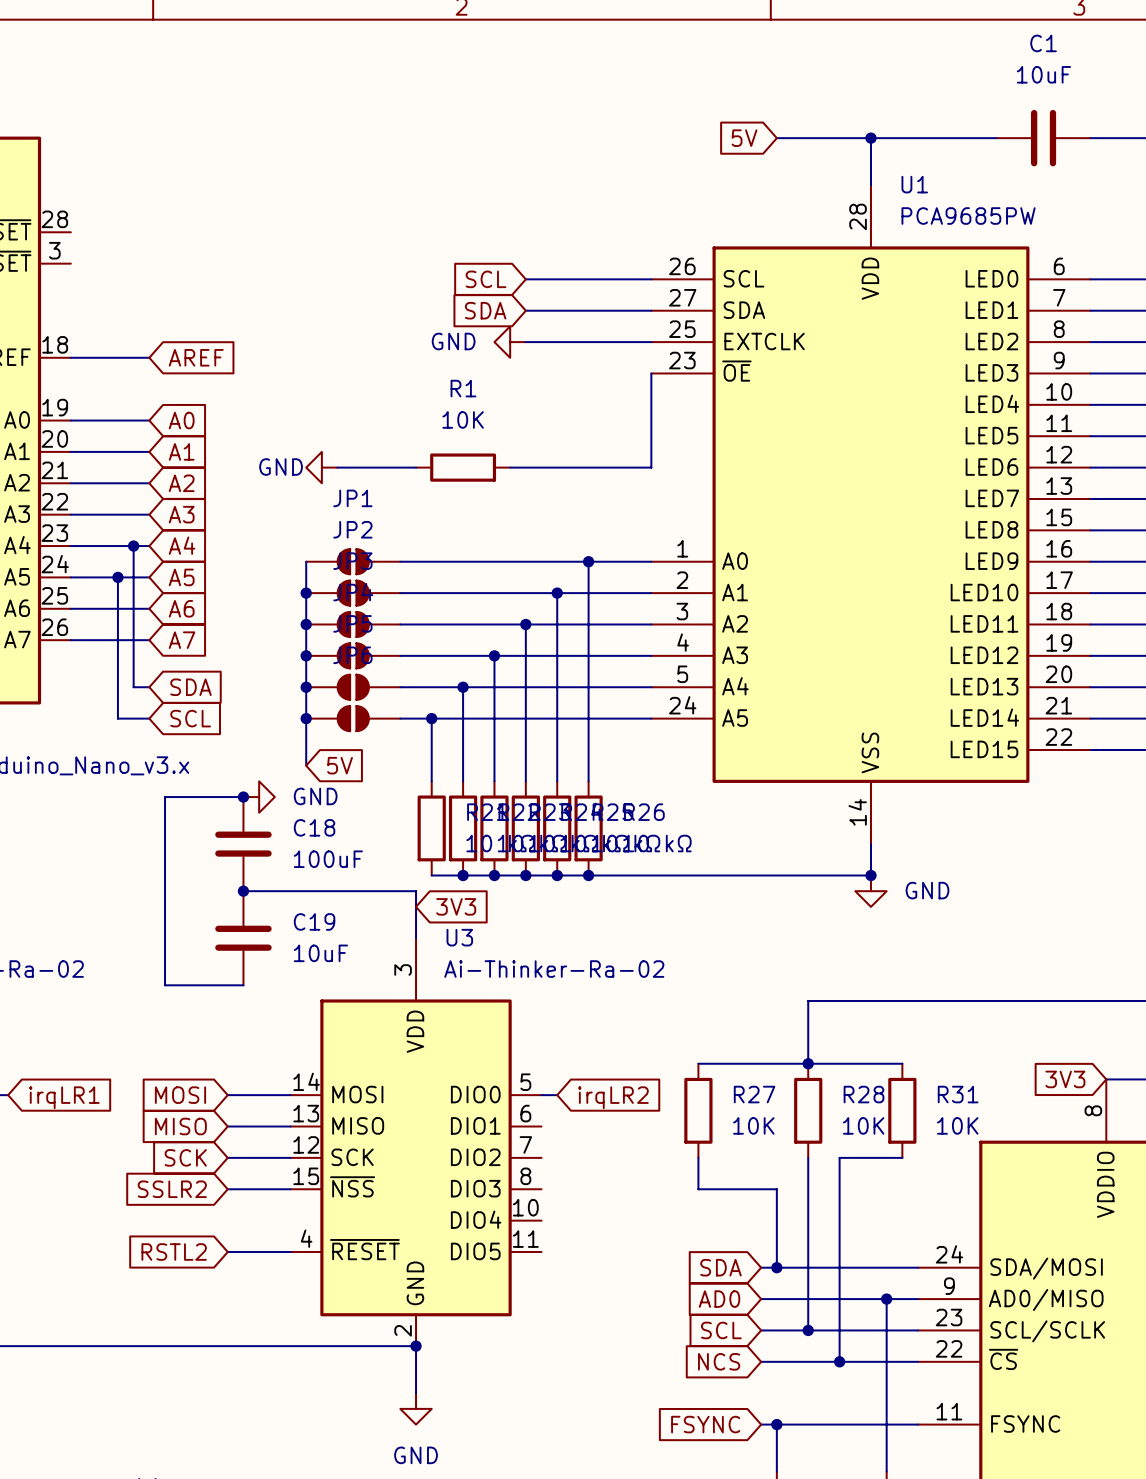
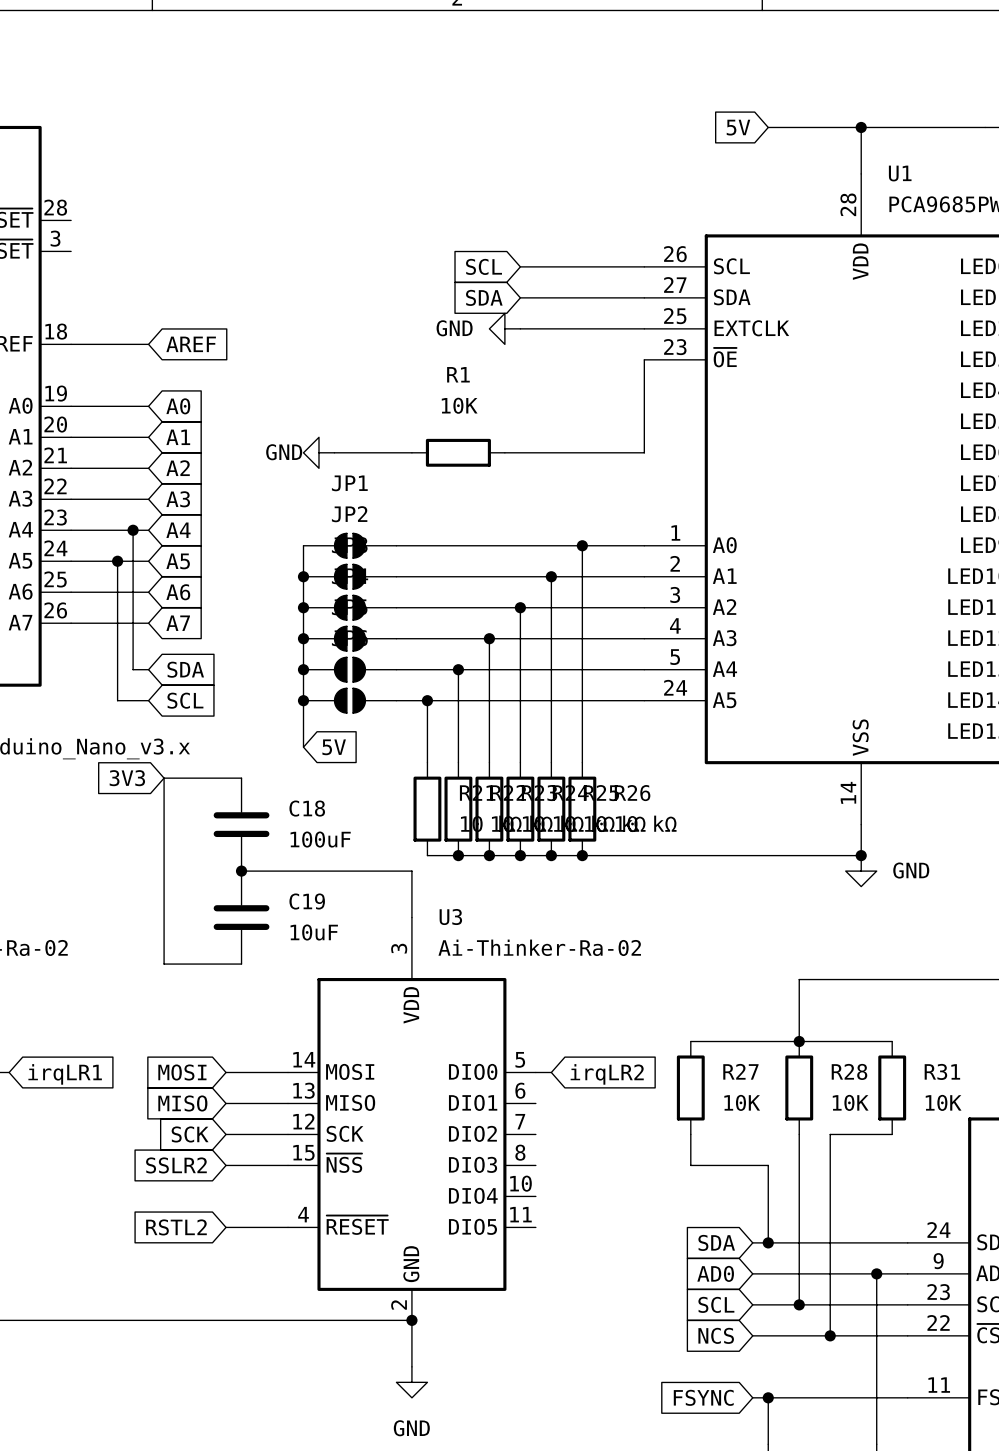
junction: (243, 797) -> none
power symbol: GND (259, 797) -> none
global label rotation: 0° (456, 906) -> 180° (127, 778)
global label position: 3V3 (456, 906) -> 3V3 (127, 778)

